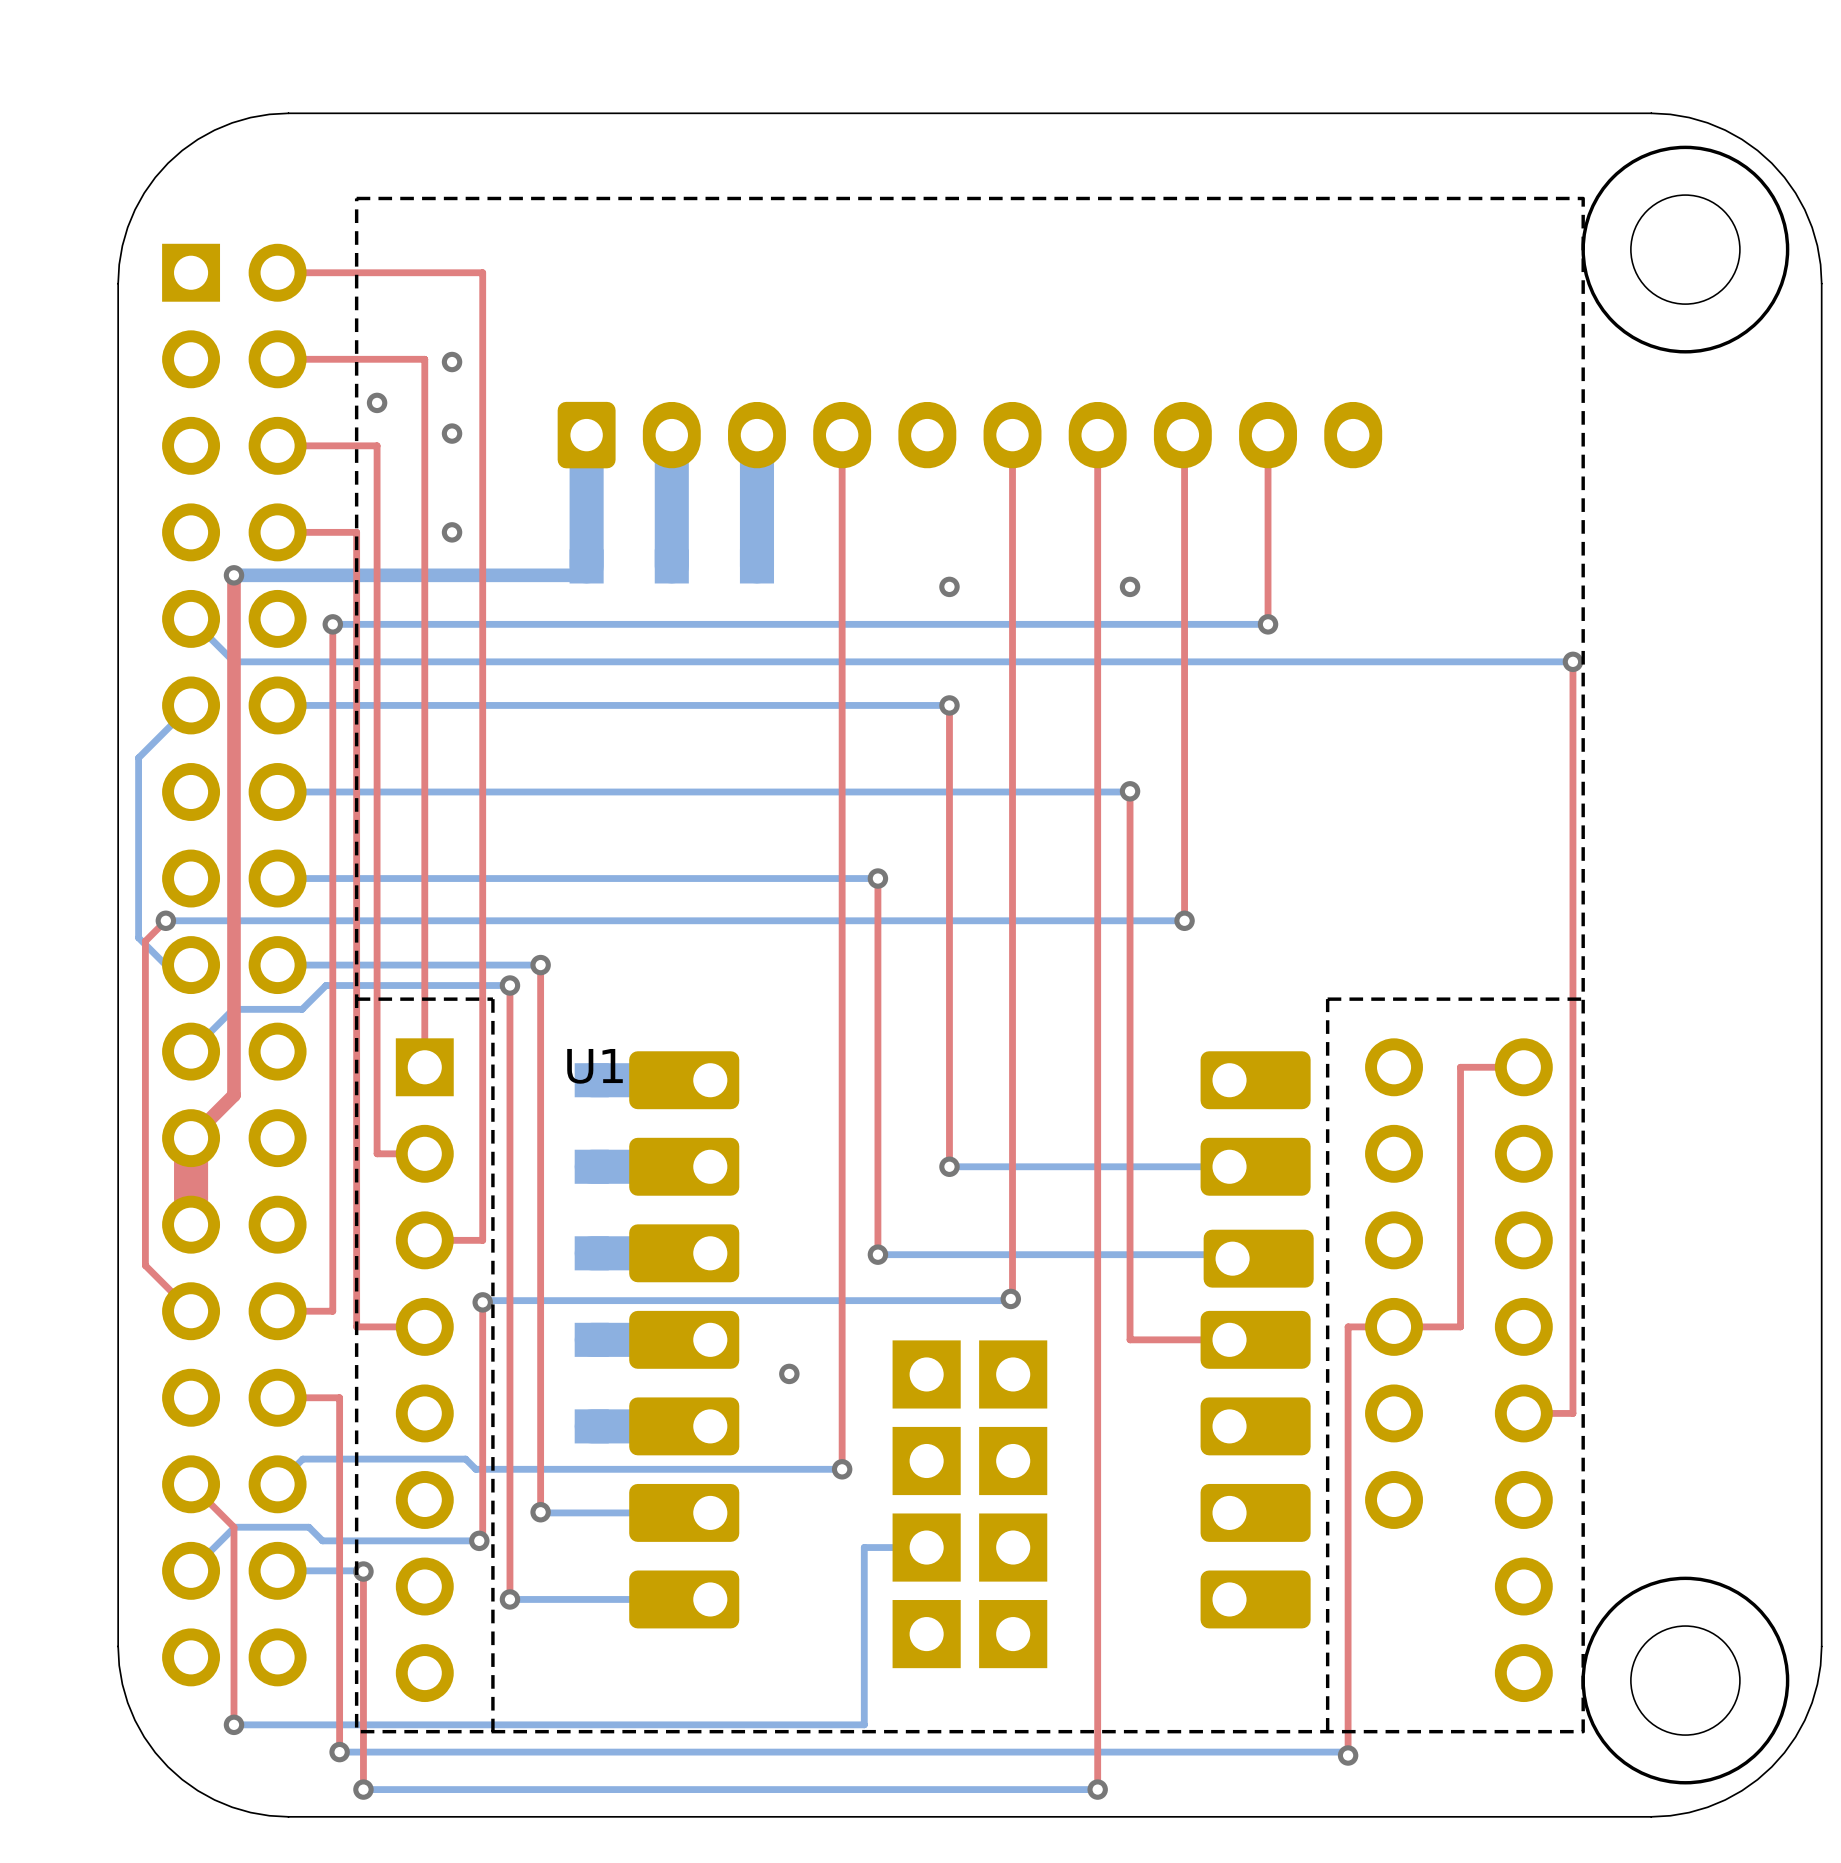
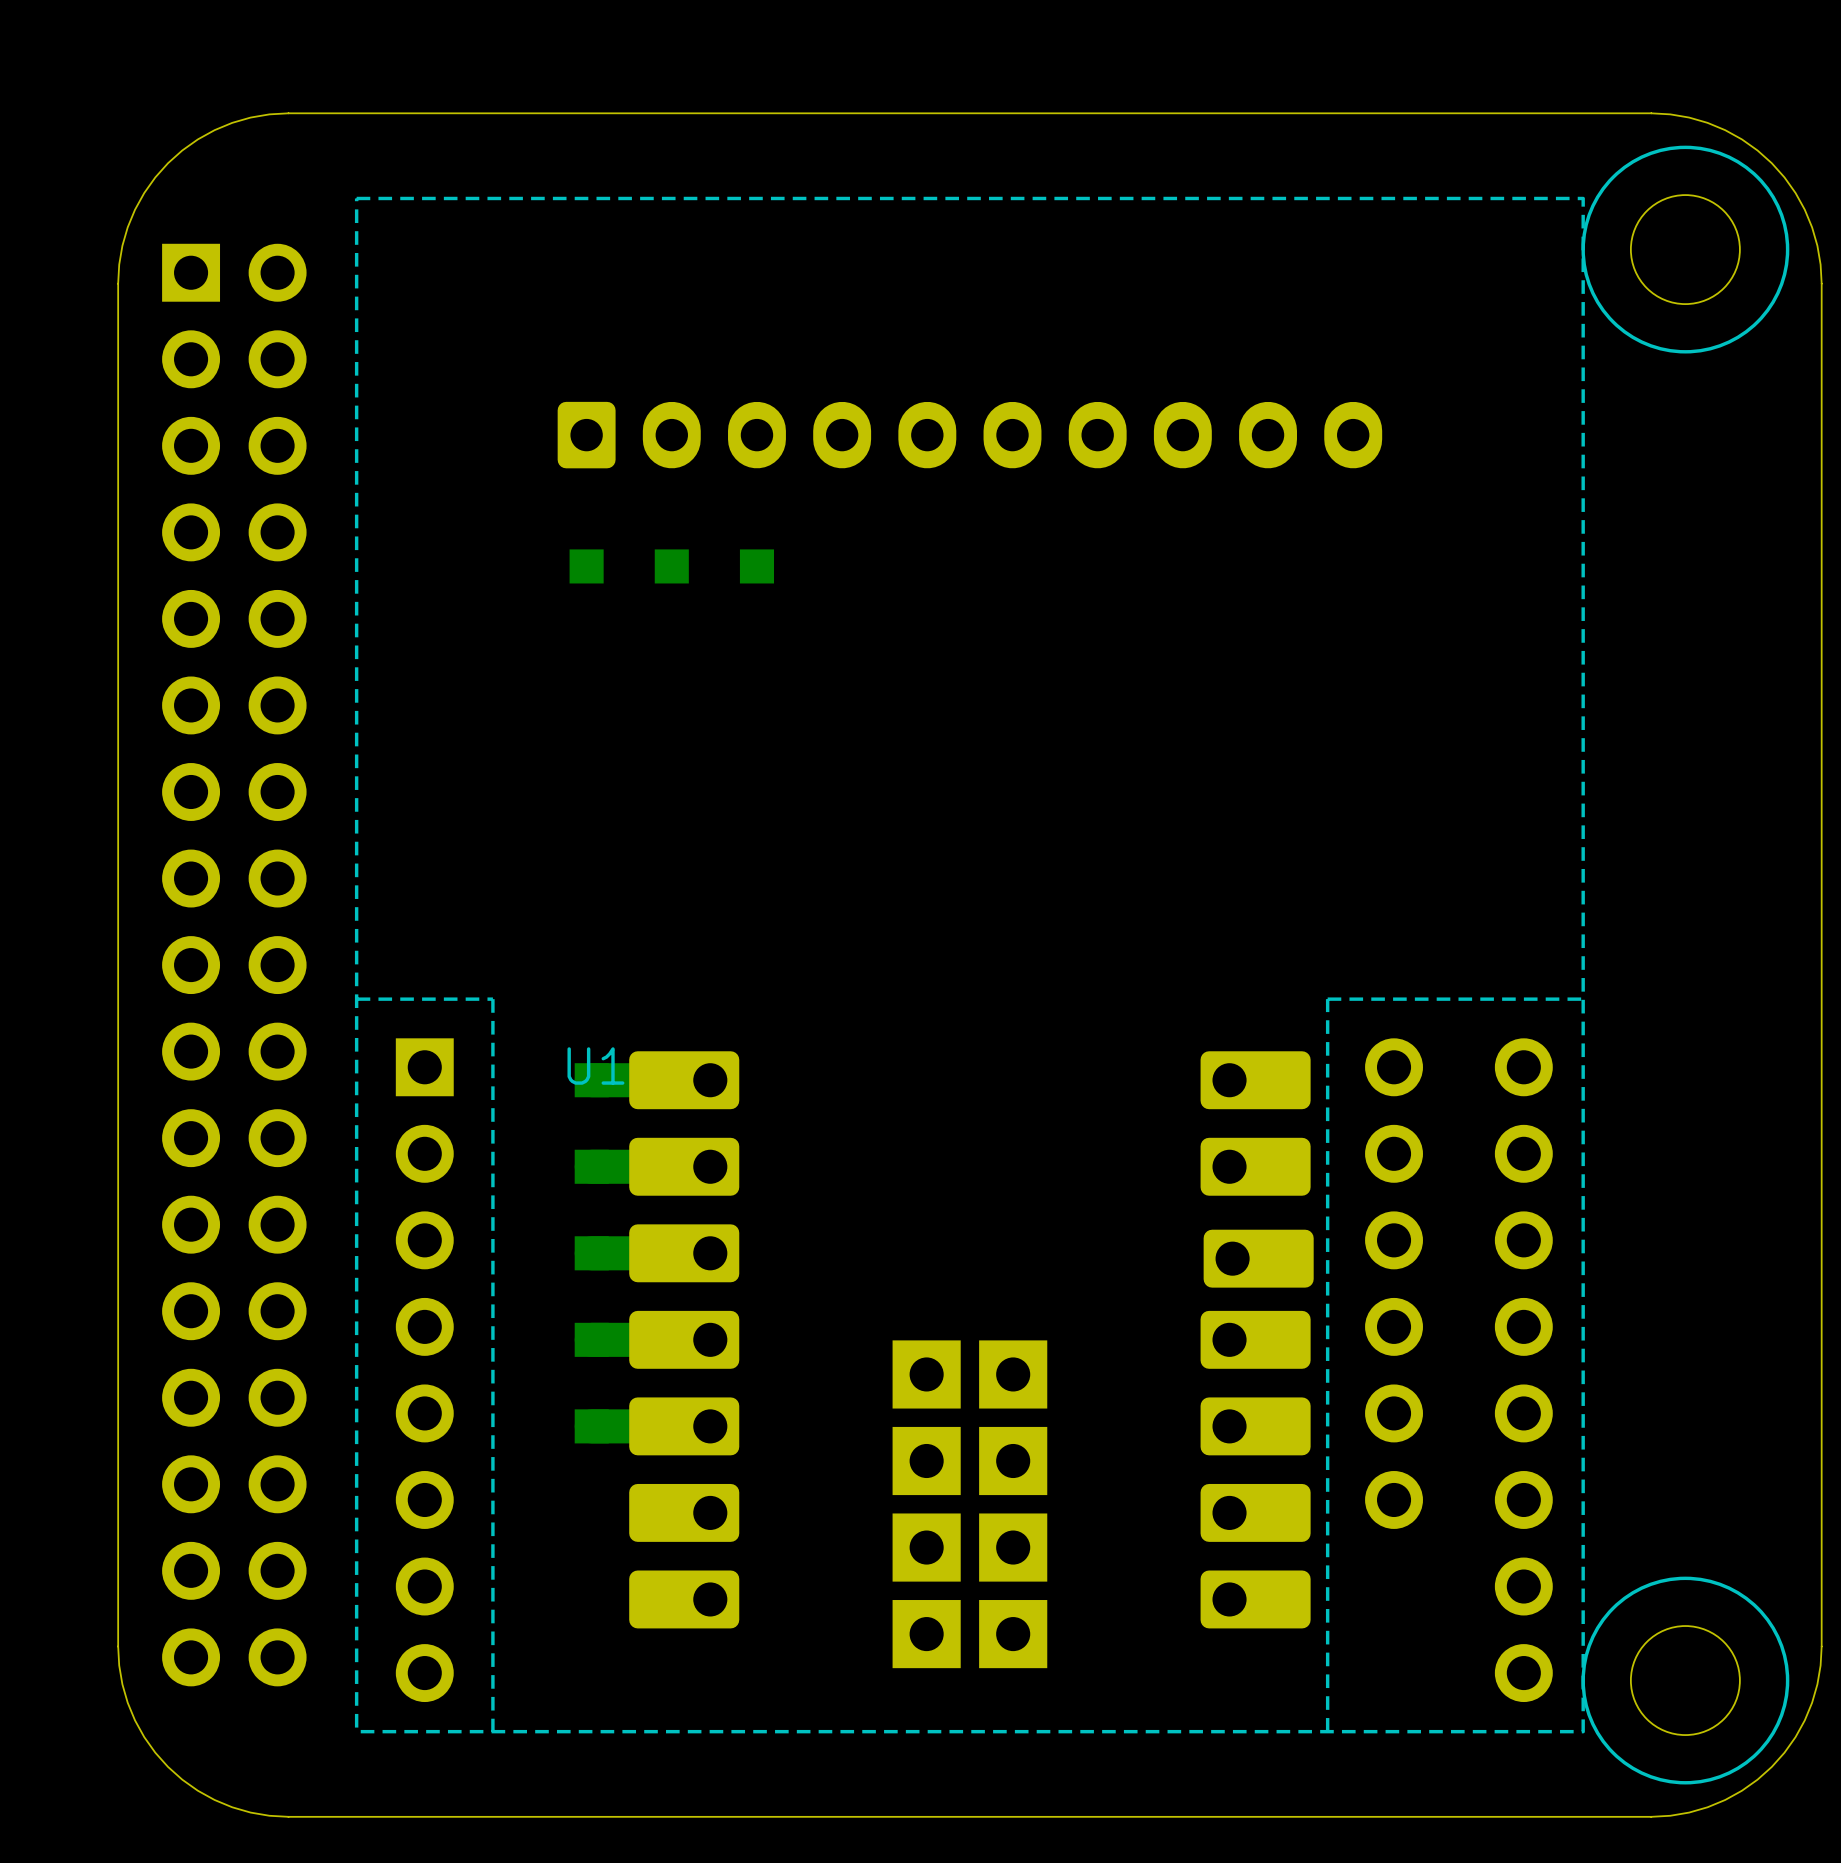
top track: (277, 272) (482, 272) (482, 1240) (424, 1240) -> none
top track: (277, 359) (424, 359) (424, 1067) -> none
via: (452, 362) -> none
via: (377, 402) -> none
via: (452, 433) -> none
bottom track: (586, 435) (586, 566) (577, 575) (233, 575) -> none
bottom track: (671, 435) (671, 566) -> none
bottom track: (756, 435) (756, 566) -> none
top track: (842, 435) (842, 1469) -> none
top track: (1012, 435) (1012, 1293) (1010, 1298) -> none
top track: (1097, 435) (1097, 1789) -> none
top track: (1182, 435) (1184, 436) (1184, 920) -> none
top track: (1268, 435) (1268, 624) -> none
top track: (277, 445) (377, 445) (377, 1153) (424, 1153) -> none
top track: (277, 532) (356, 532) (356, 1326) (424, 1326) -> none
via: (452, 532) -> none
top track: (233, 575) (233, 1095) (191, 1138) (191, 1224) -> none
via: (233, 575) -> none
via: (949, 586) -> none
via: (1130, 586) -> none
bottom track: (191, 618) (233, 661) (1572, 661) -> none
top track: (332, 624) (332, 1311) (277, 1311) -> none
bottom track: (332, 624) (1268, 624) -> none
via: (332, 624) -> none
via: (1268, 624) -> none
top track: (1572, 661) (1572, 1413) (1523, 1413) -> none
via: (1572, 661) -> none
bottom track: (191, 705) (138, 757) (138, 937) (165, 965) (191, 965) -> none
bottom track: (277, 705) (949, 705) -> none
top track: (949, 705) (949, 1166) -> none
via: (949, 705) -> none
top track: (1130, 791) (1130, 1339) (1229, 1339) -> none
bottom track: (1130, 791) (277, 791) -> none
via: (1130, 791) -> none
bottom track: (277, 878) (877, 878) -> none
top track: (877, 878) (877, 1254) -> none
via: (877, 878) -> none
top track: (165, 920) (145, 941) (145, 1265) (191, 1311) -> none
bottom track: (165, 920) (1184, 920) -> none
via: (165, 920) -> none
via: (1184, 920) -> none
bottom track: (277, 965) (540, 965) -> none
top track: (540, 965) (540, 1512) -> none
via: (540, 965) -> none
top track: (509, 985) (509, 1599) -> none
bottom track: (509, 985) (325, 985) (302, 1009) (233, 1009) (191, 1051) -> none
via: (509, 985) -> none
top track: (1523, 1067) (1460, 1067) (1460, 1326) (1348, 1326) (1348, 1755) -> none
bottom track: (949, 1166) (1229, 1166) -> none
via: (949, 1166) -> none
bottom track: (877, 1254) (1228, 1254) (1232, 1258) -> none
via: (877, 1254) -> none
bottom track: (1010, 1298) (1009, 1300) (484, 1300) (482, 1302) -> none
via: (1010, 1298) -> none
top track: (482, 1302) (482, 1537) (479, 1540) -> none
via: (482, 1302) -> none
via: (789, 1373) -> none
top track: (277, 1397) (339, 1397) (339, 1755) -> none
bottom track: (842, 1469) (475, 1469) (465, 1459) (302, 1459) (277, 1484) -> none
via: (842, 1469) -> none
top track: (191, 1484) (233, 1527) (233, 1724) -> none
bottom track: (540, 1512) (710, 1512) -> none
via: (540, 1512) -> none
bottom track: (479, 1540) (322, 1540) (308, 1527) (234, 1527) (191, 1570) -> none
via: (479, 1540) -> none
bottom track: (926, 1547) (864, 1547) (864, 1724) (233, 1724) -> none
bottom track: (277, 1570) (363, 1571) -> none
top track: (363, 1571) (363, 1789) -> none
via: (363, 1571) -> none
bottom track: (509, 1599) (710, 1599) -> none
via: (509, 1599) -> none
via: (233, 1724) -> none
bottom track: (339, 1752) (1344, 1752) (1348, 1755) -> none
via: (339, 1752) -> none
via: (1348, 1755) -> none
bottom track: (363, 1789) (1097, 1789) -> none
via: (363, 1789) -> none
via: (1097, 1789) -> none

